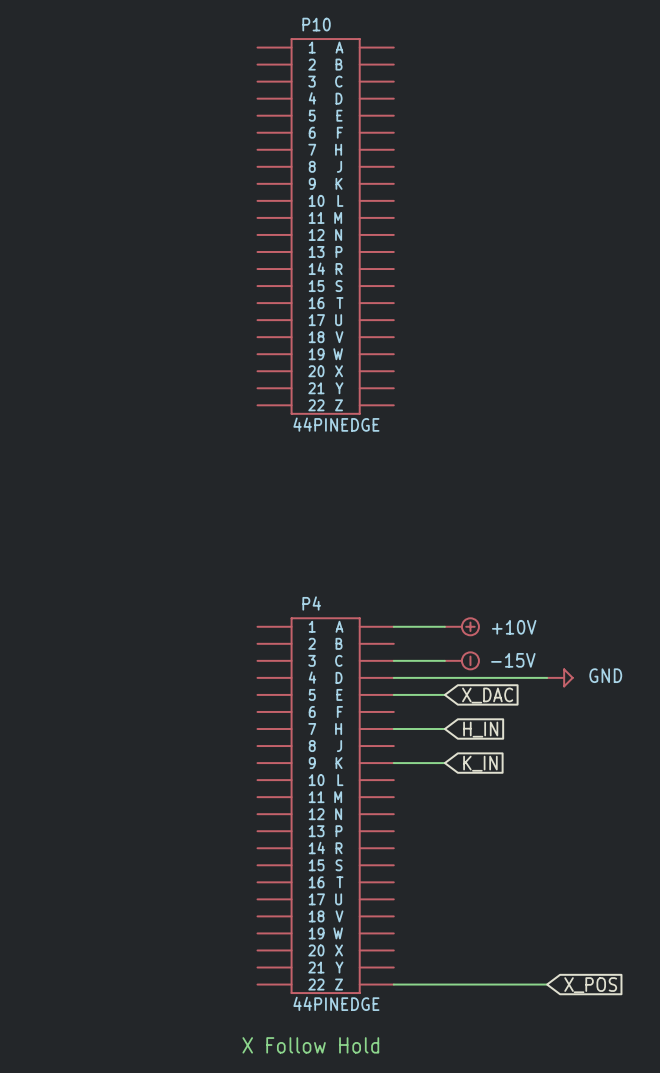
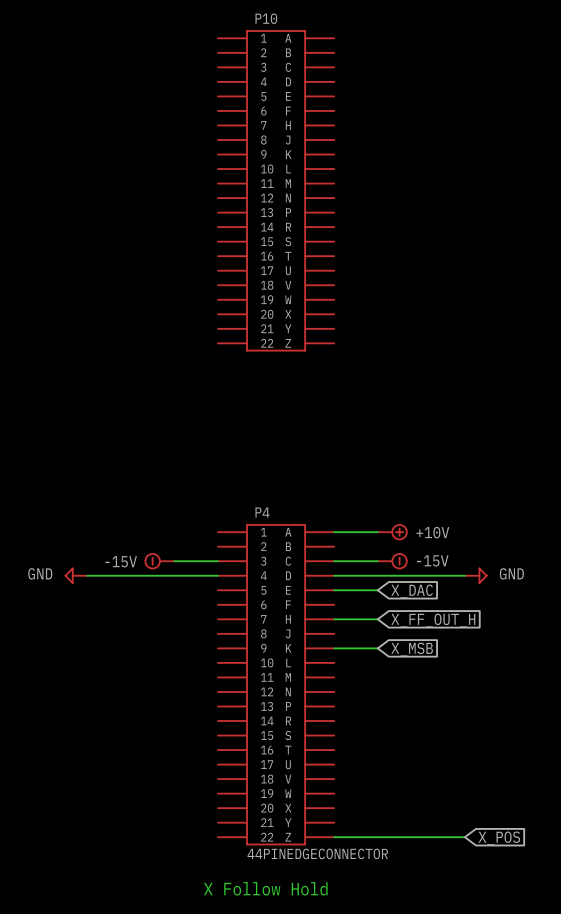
P10 value: 44PINEDGE (336, 424) -> none
power symbol: none -> -15V (159, 561)
wire: none -> (174, 561) (217, 561)
power symbol: none -> GND (76, 575)
wire: none -> (87, 575) (217, 575)
global label: H_IN (480, 729) -> X_FF_OUT_H (433, 620)
global label: K_IN (480, 763) -> X_MSB (412, 649)
P4 value: 44PINEDGE (336, 1003) -> 44PINEDGECONNECTOR (317, 853)

